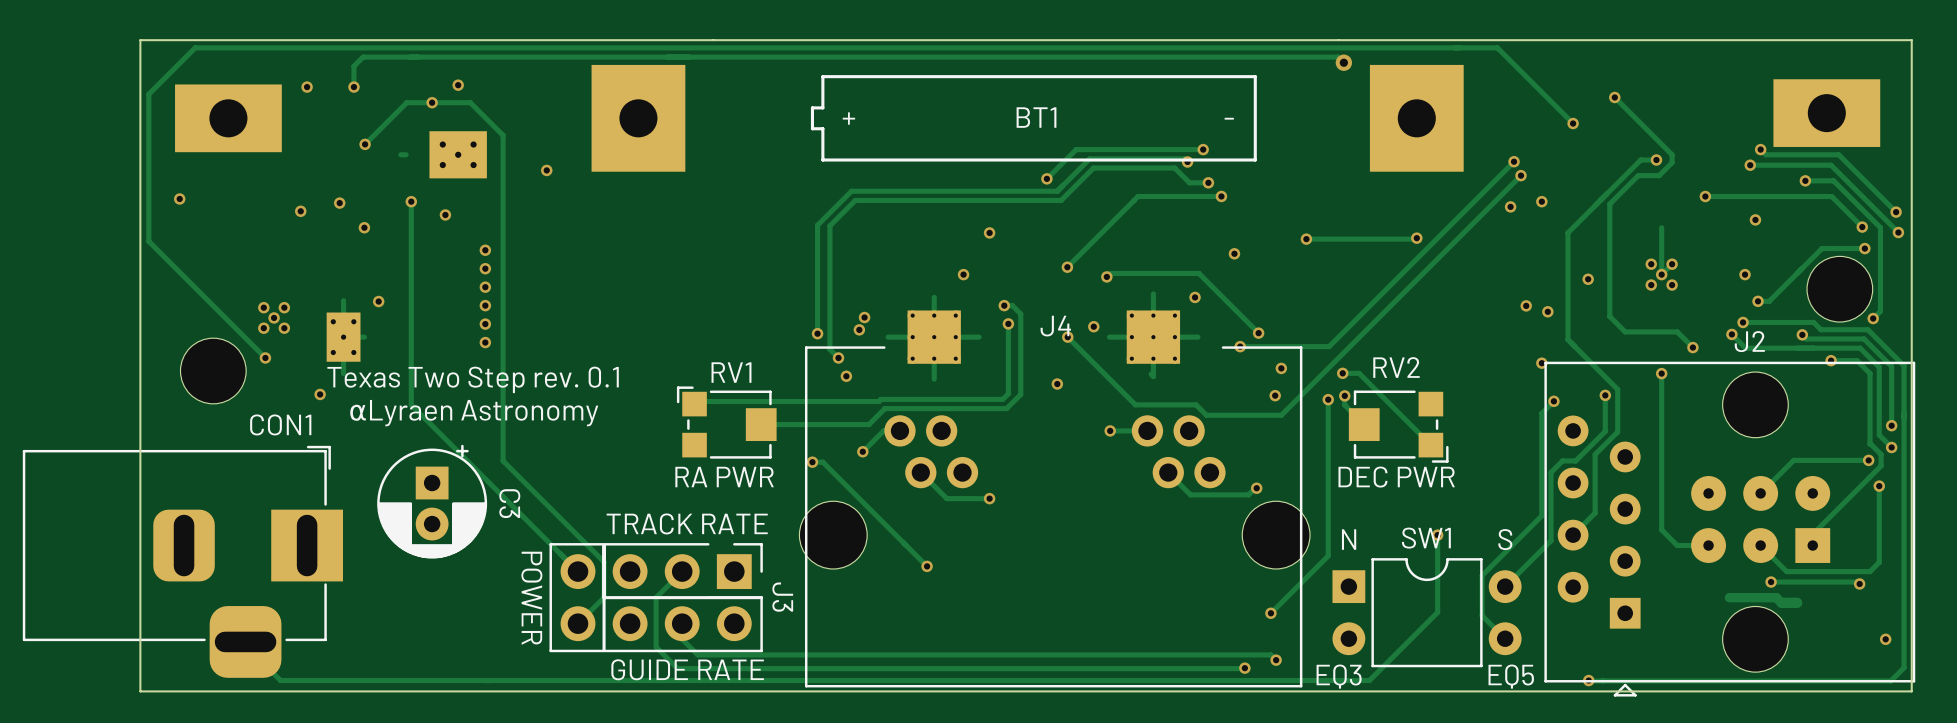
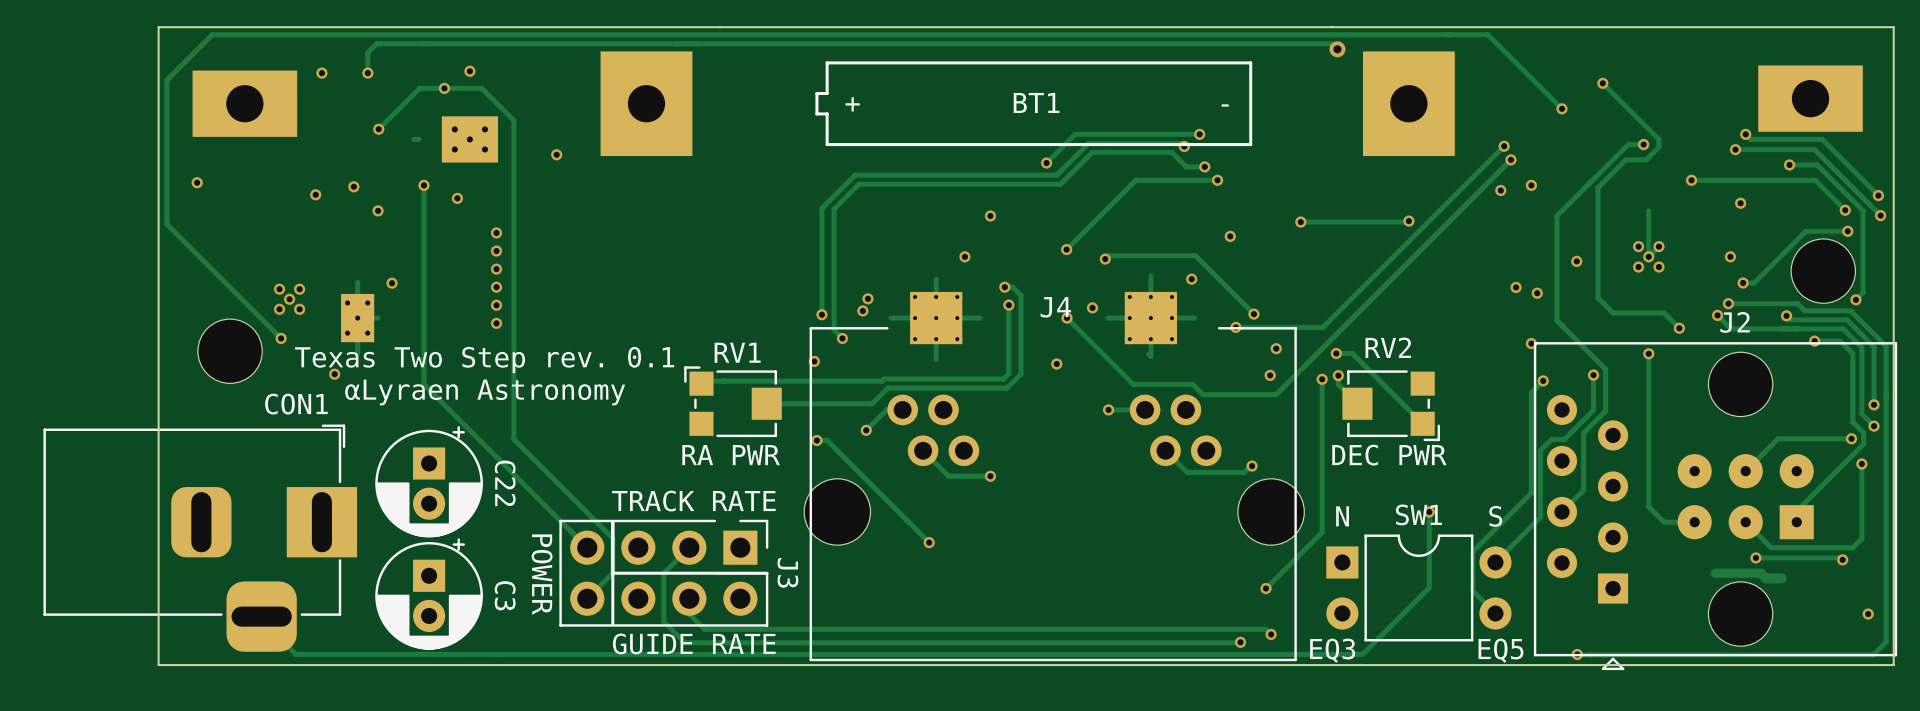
via position: (846, 376) -> (814, 361)
C3 position: (432, 501) -> (429, 594)
C22: none -> (429, 481)

